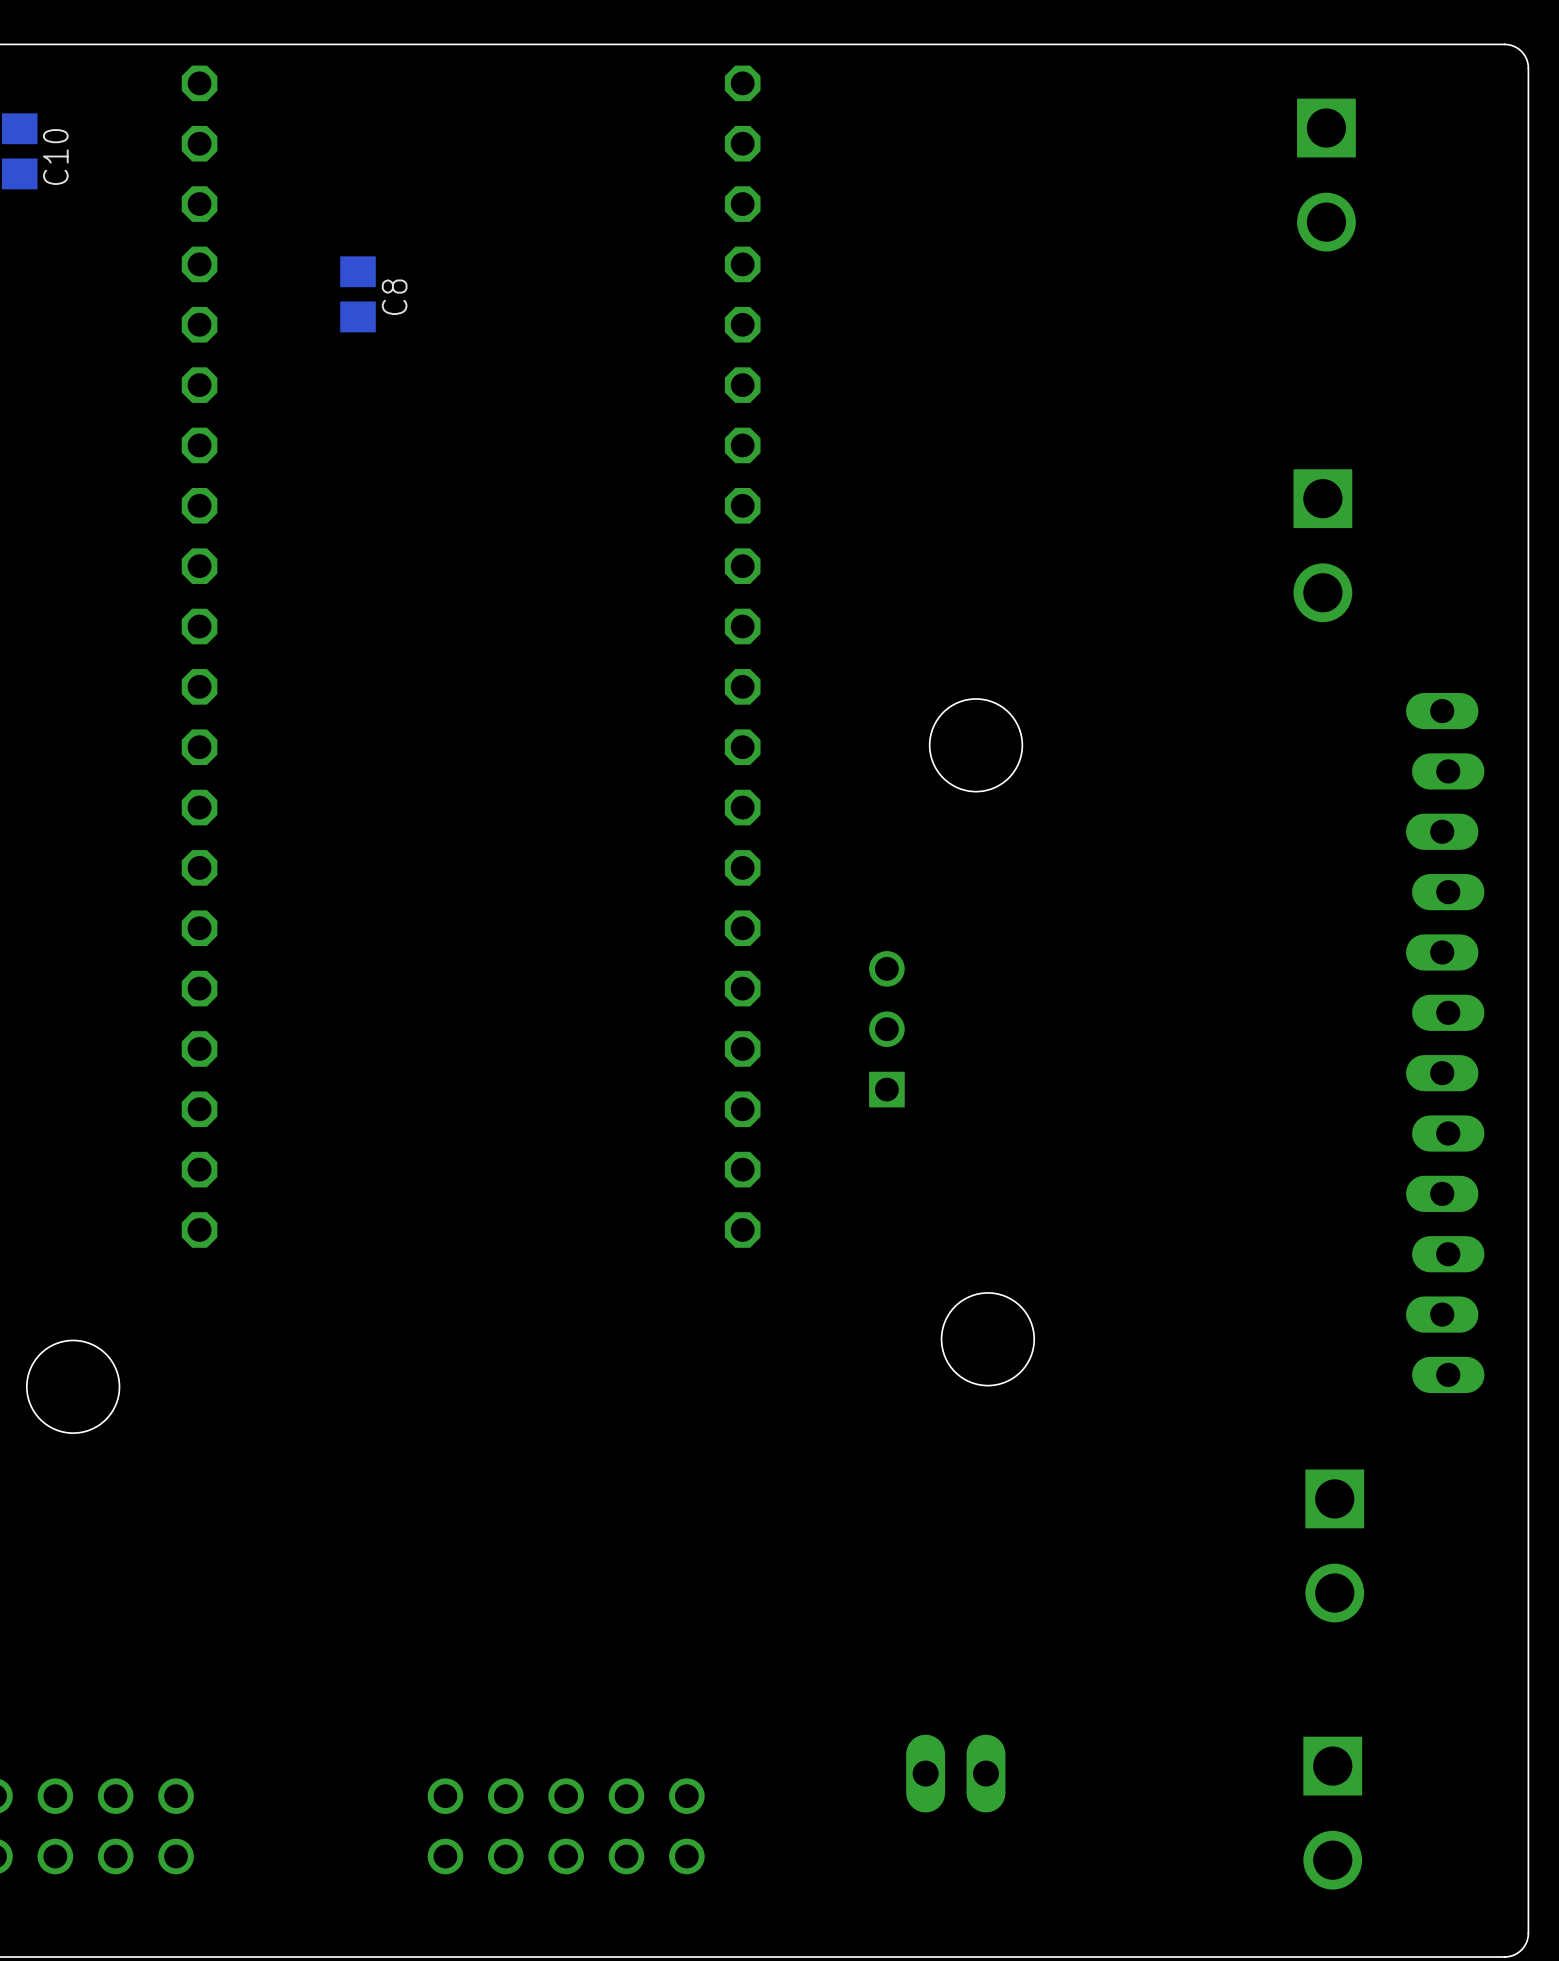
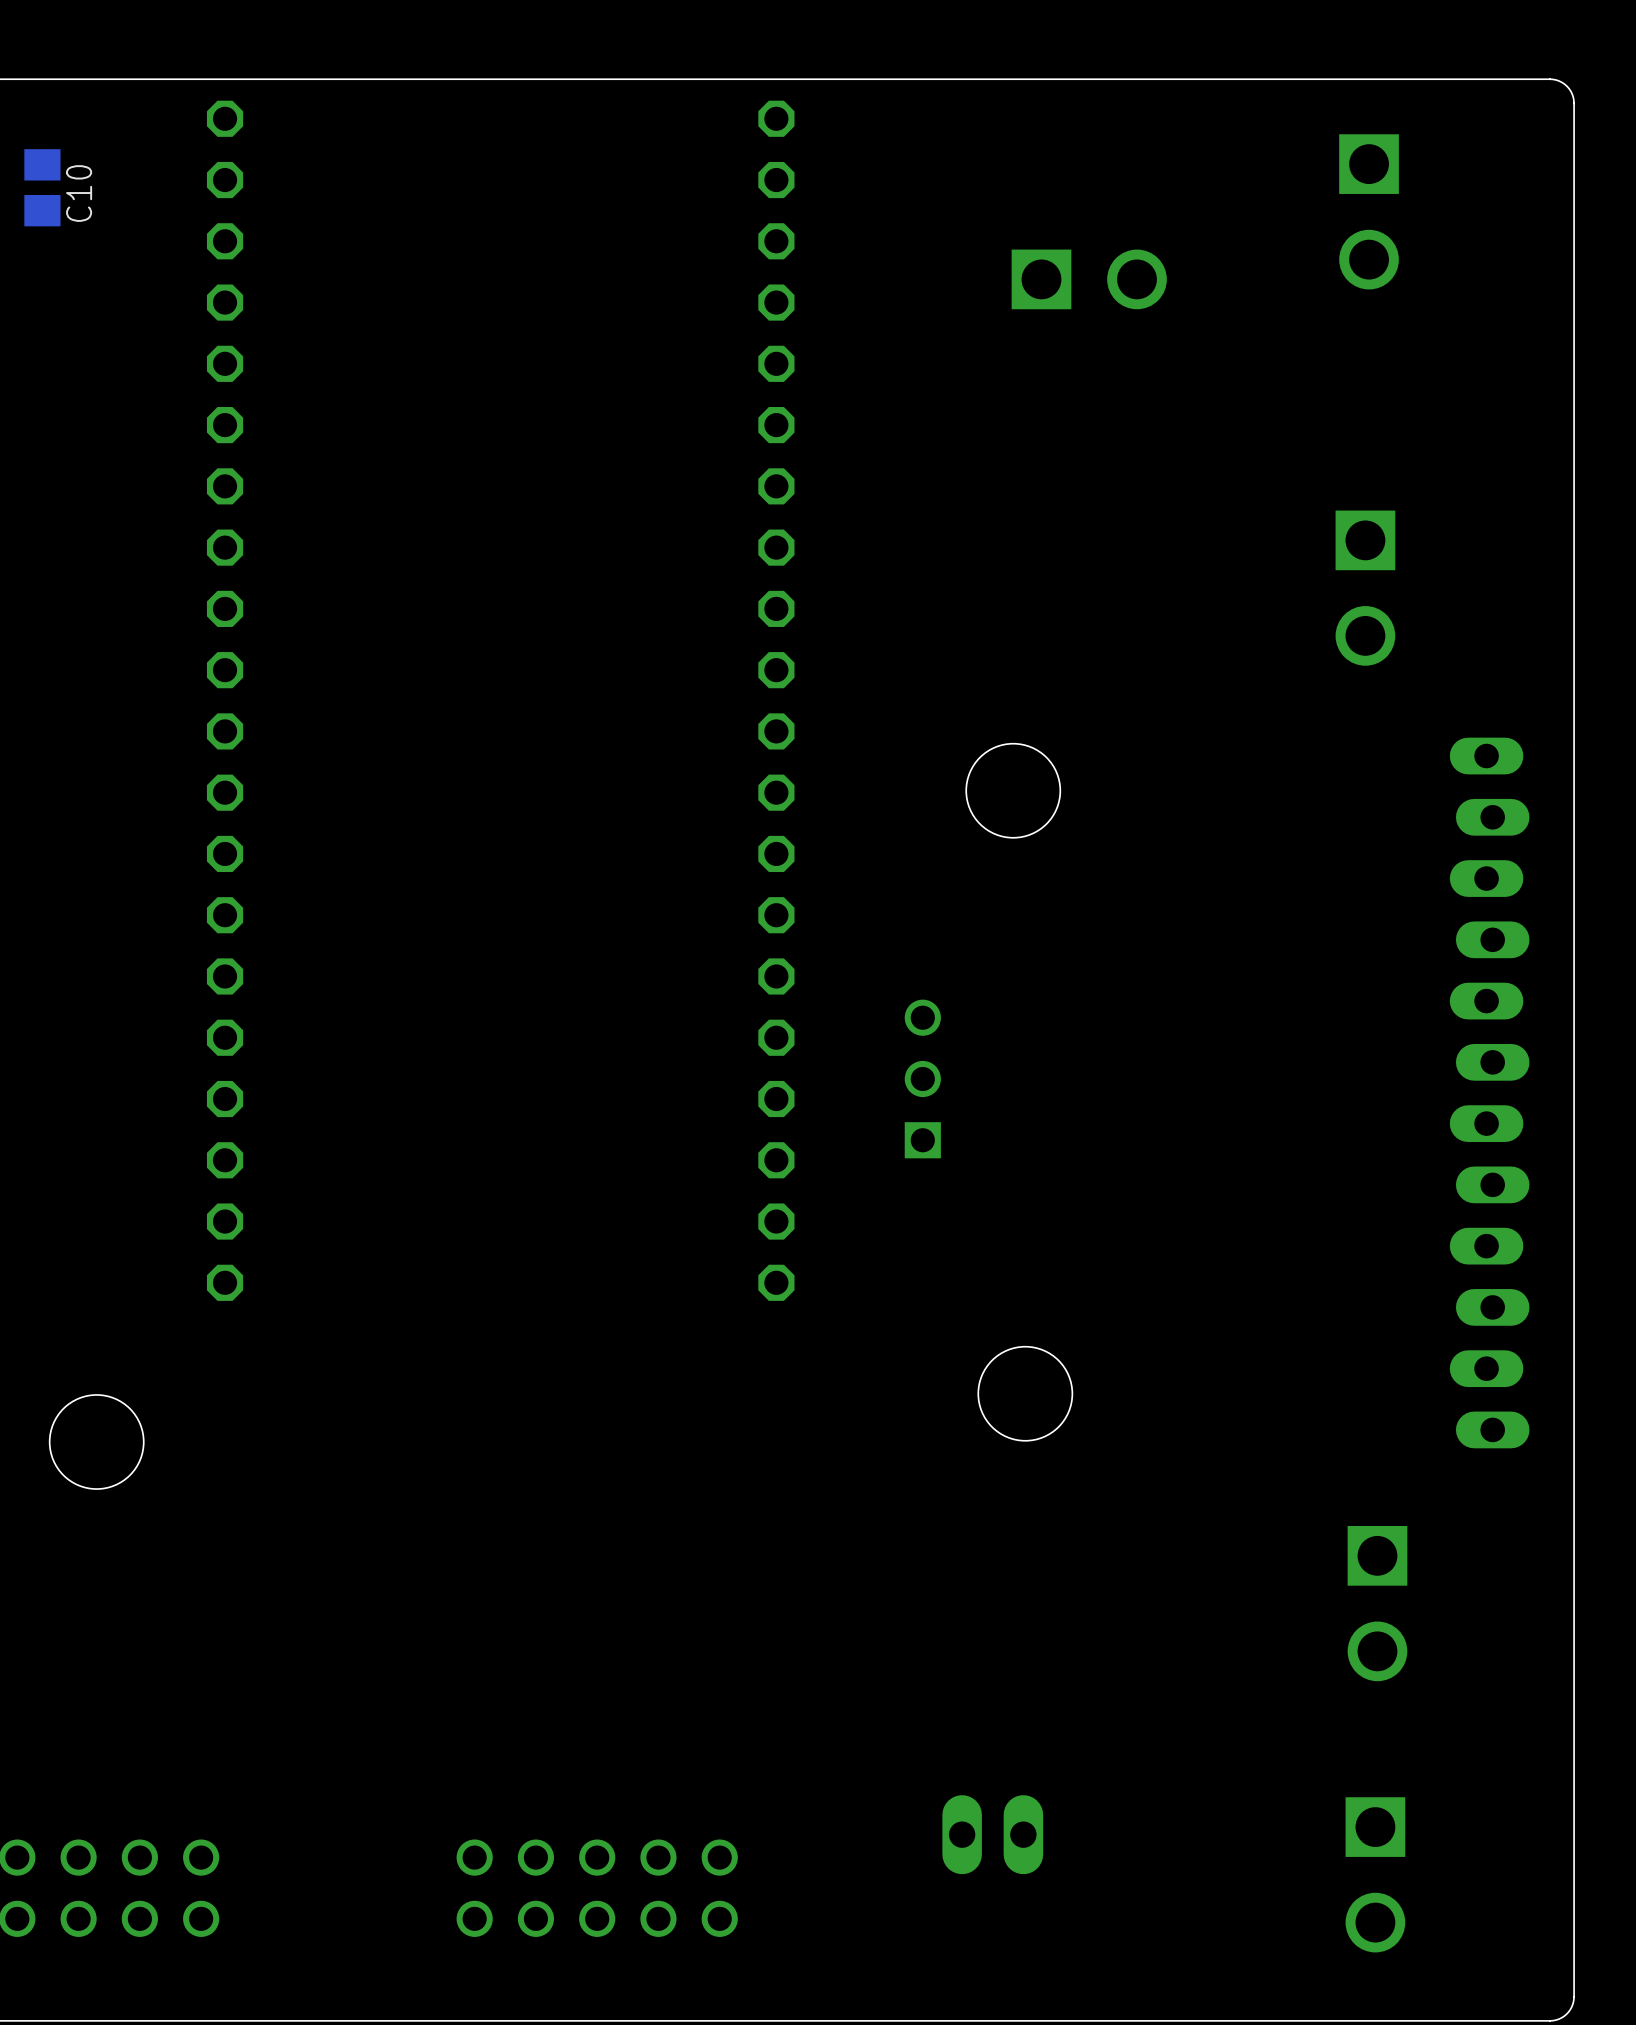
part: none -> (1089, 279)
C8: (358, 294) -> none

